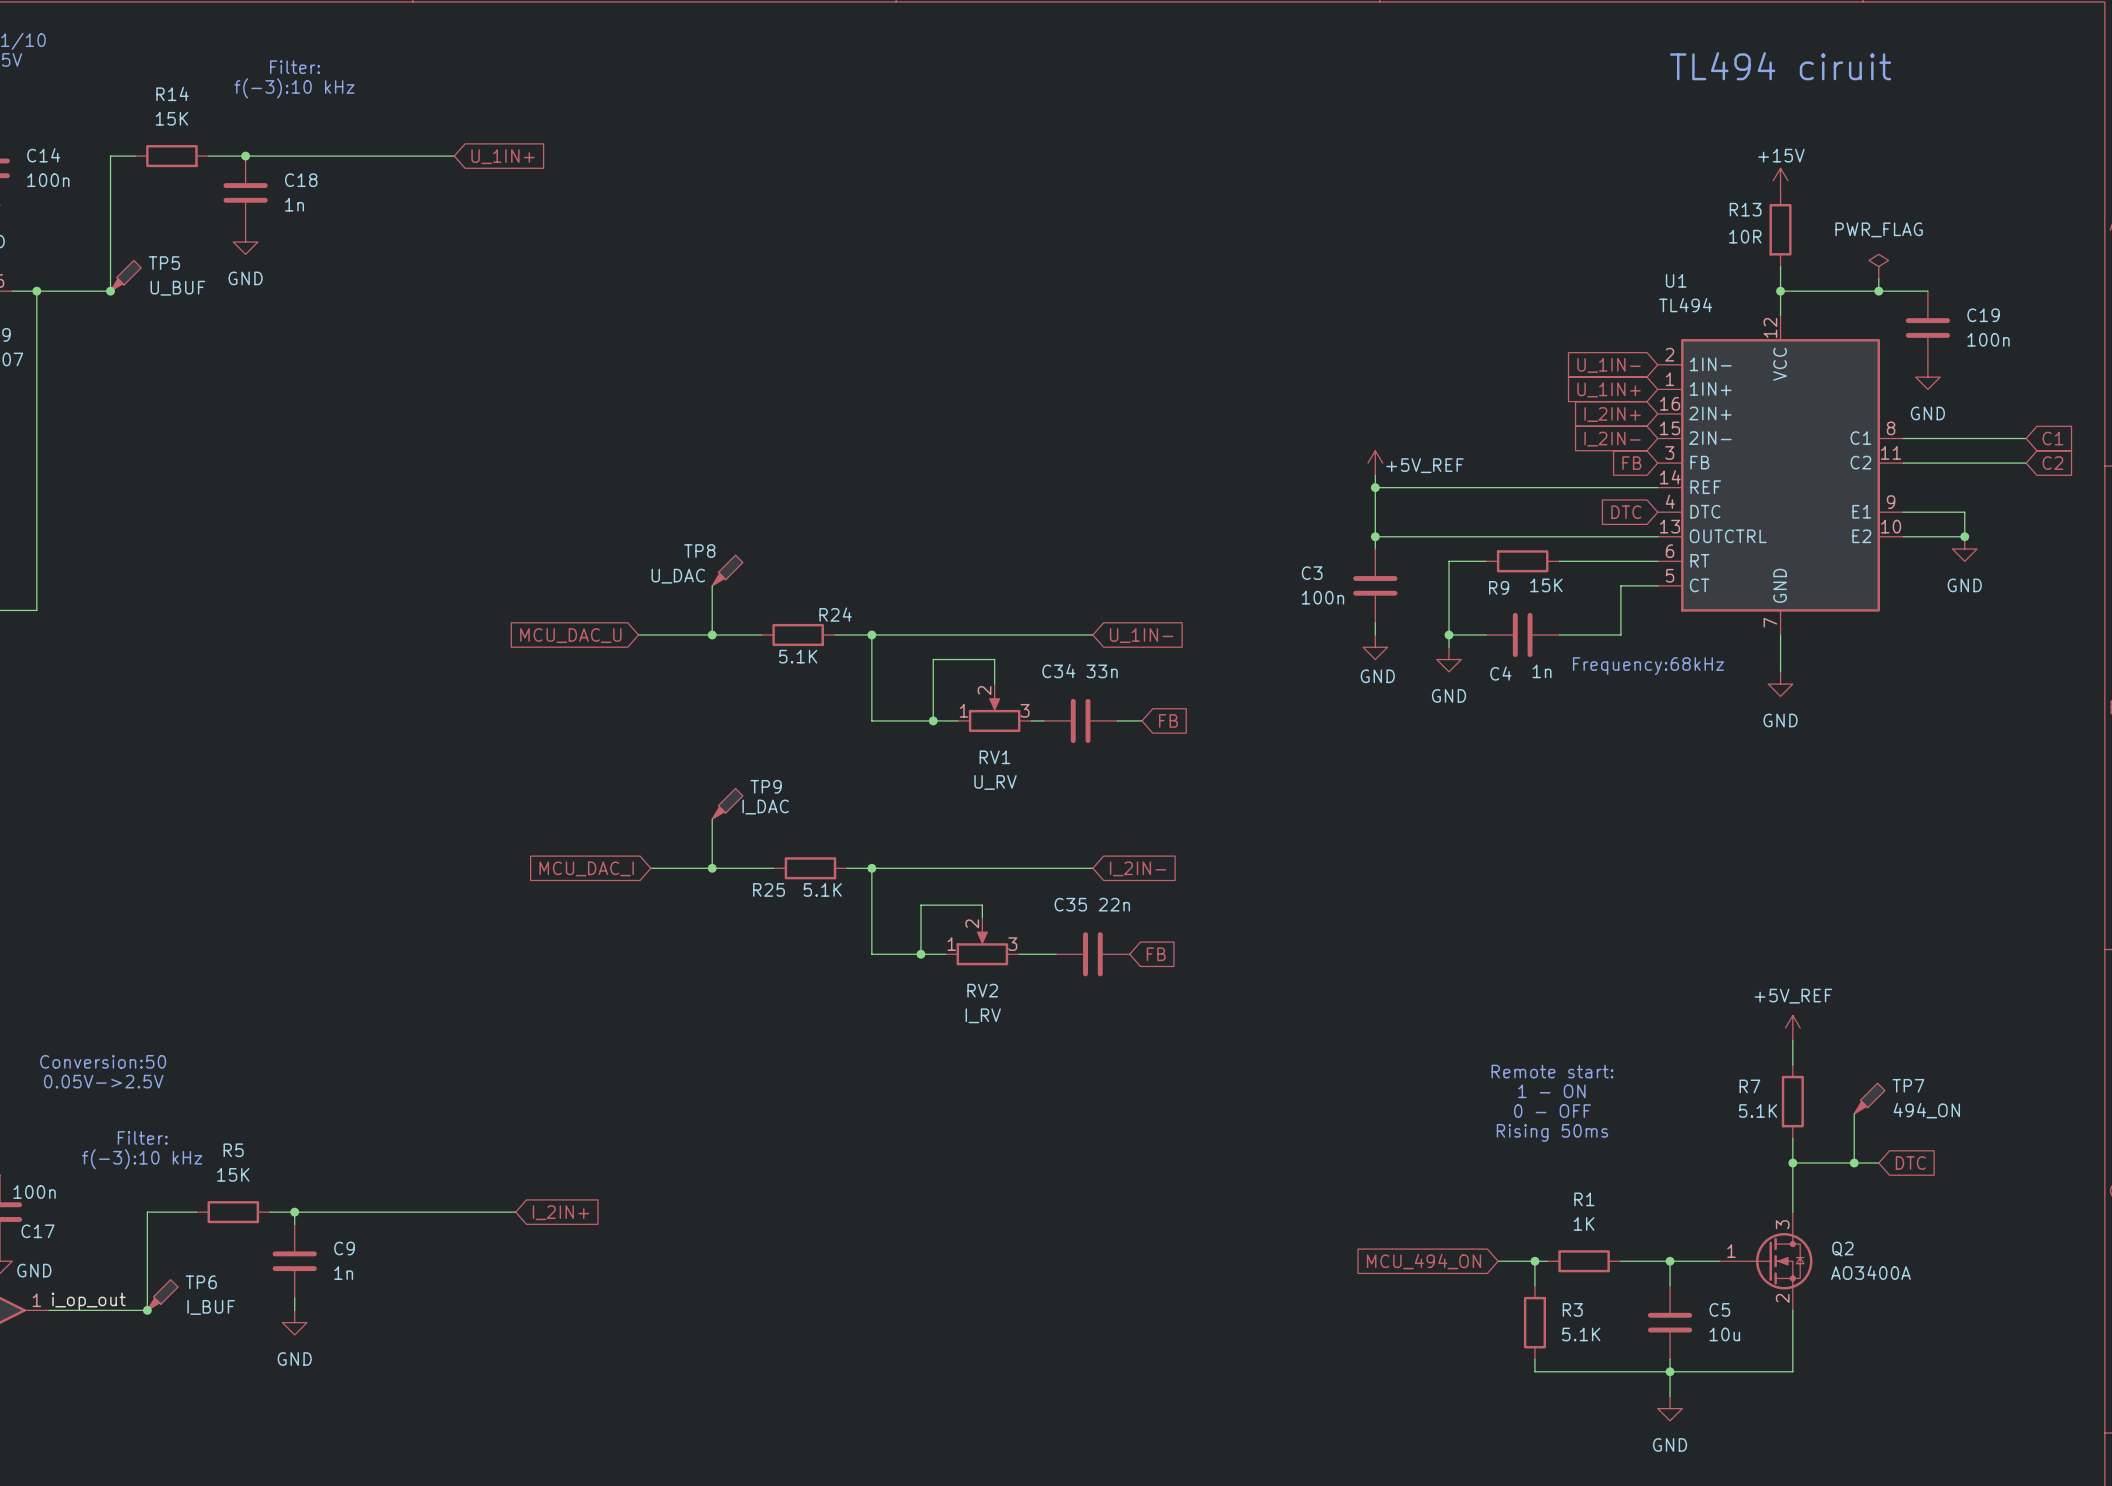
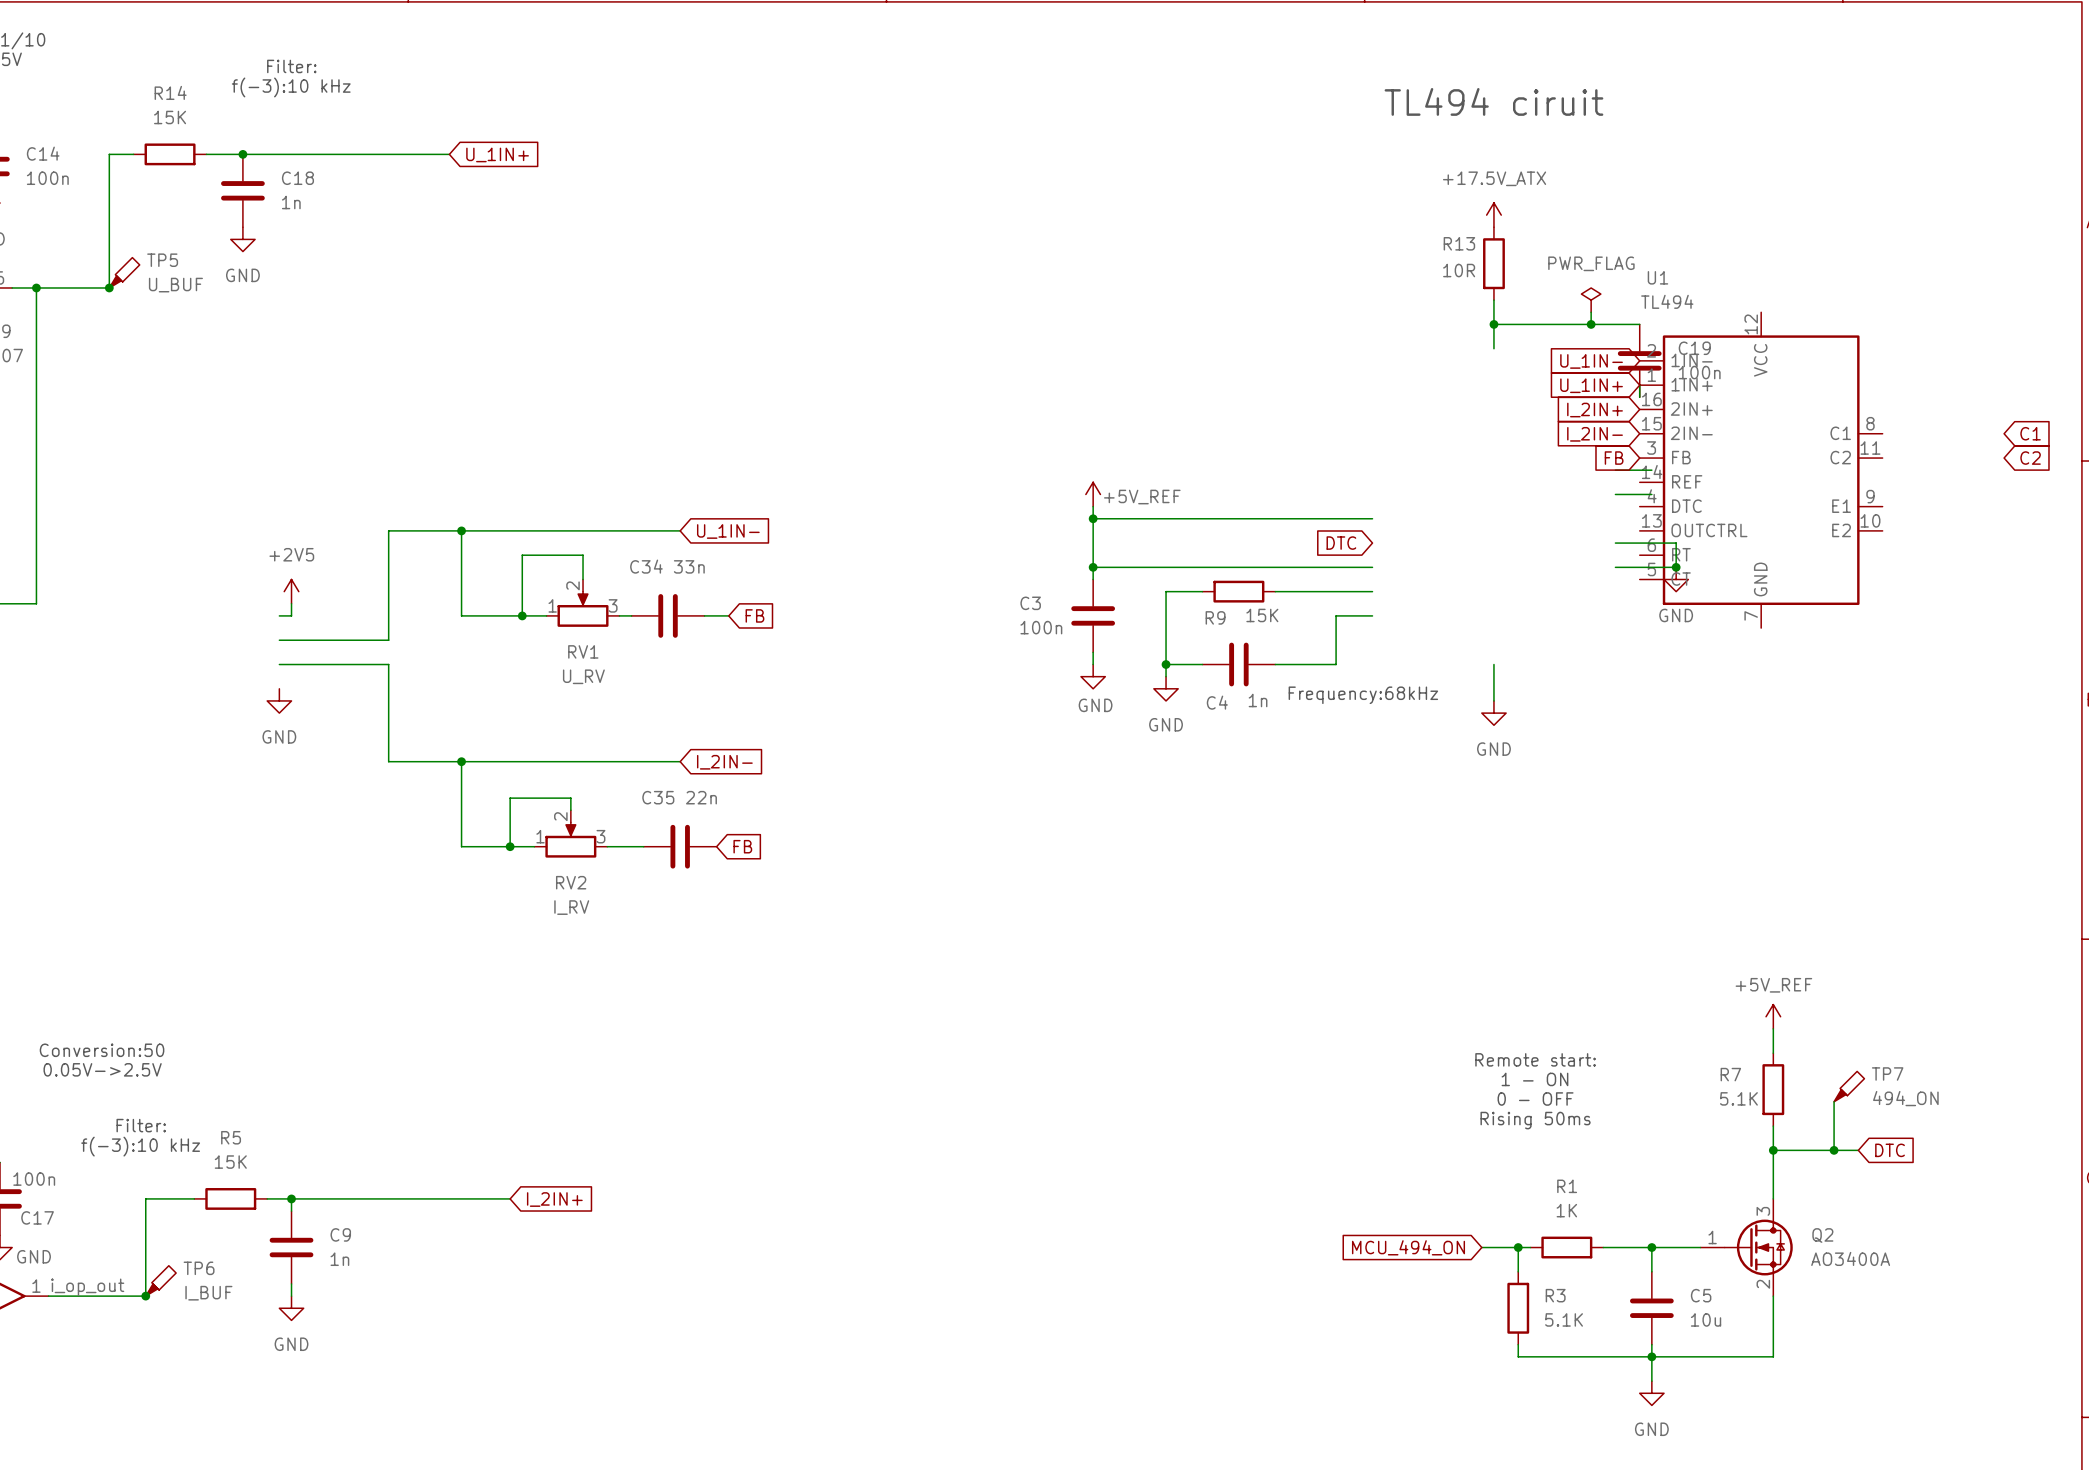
text: TL494 ciruit (1780, 66) -> none
text: none -> TL494 ciruit (1493, 101)
power symbol: +15V (1780, 180) -> none
power symbol: none -> +17.5V_ATX (1493, 215)
R13 position: (1780, 229) -> (1493, 263)
wire: (1780, 266) (1780, 315) -> none
power symbol: PWR_FLAG (1878, 266) -> none
wire: (1878, 278) (1878, 291) -> none
wire: (1780, 291) (1927, 291) -> none
junction: (1780, 291) -> none
junction: (1878, 291) -> none
wire: none -> (1493, 300) (1493, 348)
power symbol: none -> PWR_FLAG (1591, 300)
wire: none -> (1591, 312) (1591, 324)
wire: none -> (1493, 324) (1639, 324)
junction: none -> (1493, 324)
junction: none -> (1591, 324)
C19 position: (1927, 328) -> (1639, 360)
power symbol: GND (1927, 377) -> none
wire: none -> (1639, 385) (1639, 397)
wire: (1903, 438) (2026, 438) -> none
power symbol: +5V_REF (1375, 463) -> none
wire: (1903, 463) (2026, 463) -> none
wire: (1375, 475) (1375, 549) -> none
wire: none -> (1615, 470) (1651, 470)
wire: (1375, 487) (1657, 487) -> none
junction: (1375, 487) -> none
power symbol: none -> +5V_REF (1093, 494)
wire: none -> (1093, 506) (1093, 579)
global label: DTC (1626, 512) -> none
wire: (1903, 512) (1964, 512) (1964, 536) (1903, 536) -> none
wire: none -> (1093, 518) (1372, 518)
junction: none -> (1093, 518)
wire: none -> (461, 530) (461, 615) (546, 615)
junction: none -> (461, 530)
wire: none -> (680, 530) (388, 530) (388, 640) (279, 640)
wire: (1375, 536) (1657, 536) -> none
junction: (1375, 536) -> none
junction: (1964, 536) -> none
global label: none -> U_1IN- (728, 531)
global label: none -> DTC (1341, 543)
wire: none -> (1615, 543) (1676, 543) (1676, 567) (1615, 567)
power symbol: GND (1964, 549) -> none
wire: (1485, 561) (1449, 561) (1449, 647) -> none
R9 position: (1522, 561) -> (1238, 591)
wire: (1559, 561) (1657, 561) -> none
TP8: U_DAC (727, 570) -> none
wire: none -> (1093, 567) (1372, 567)
junction: none -> (1093, 567)
junction: none -> (1676, 567)
wire: none -> (583, 579) (583, 555) (522, 555) (522, 615)
wire: (712, 585) (712, 634) -> none
C3 position: (1375, 585) -> (1093, 615)
wire: (1657, 585) (1620, 585) (1620, 634) (1559, 634) -> none
power symbol: none -> GND (1676, 579)
power symbol: none -> +2V5 (291, 591)
wire: none -> (1202, 591) (1166, 591) (1166, 676)
wire: none -> (1275, 591) (1372, 591)
wire: none -> (291, 603) (291, 615) (279, 615)
junction: none -> (522, 615)
wire: none -> (619, 615) (631, 615)
wire: none -> (704, 615) (728, 615)
global label: none -> FB (754, 615)
wire: (1375, 622) (1375, 634) -> none
wire: none -> (1372, 615) (1336, 615) (1336, 664) (1275, 664)
wire: (638, 634) (761, 634) -> none
junction: (712, 634) -> none
R24: 5.1K (798, 634) -> none
wire: (835, 634) (1092, 634) -> none
wire: (871, 634) (871, 720) (957, 720) -> none
junction: (871, 634) -> none
wire: (1449, 634) (1485, 634) -> (1615, 494) (1651, 494)
junction: (1449, 634) -> none
C4 position: (1522, 634) -> (1238, 664)
wire: (1780, 634) (1780, 671) -> none
global label: MCU_DAC_U (570, 635) -> none
global label: U_1IN- (1141, 635) -> none
power symbol: GND (1375, 647) -> none
wire: none -> (1093, 652) (1093, 664)
power symbol: GND (1449, 659) -> none
text: Frequency:68kHz (1648, 666) -> none
wire: none -> (279, 664) (388, 664) (388, 761) (680, 761)
wire: none -> (1166, 664) (1202, 664)
junction: none -> (1166, 664)
wire: none -> (1493, 664) (1493, 700)
wire: (994, 684) (994, 659) (933, 659) (933, 720) -> none
power symbol: none -> GND (1093, 676)
power symbol: GND (1780, 684) -> none
power symbol: none -> GND (1166, 688)
text: none -> Frequency:68kHz (1363, 695)
power symbol: none -> GND (279, 700)
RV1 position: (994, 708) -> (583, 603)
junction: (933, 720) -> none
wire: (1031, 720) (1043, 720) -> none
C34 position: (1080, 720) -> (668, 615)
wire: (1117, 720) (1142, 720) -> none
global label: FB (1168, 720) -> none
power symbol: none -> GND (1493, 713)
wire: none -> (461, 761) (461, 846) (534, 846)
junction: none -> (461, 761)
global label: none -> I_2IN- (724, 762)
TP9: I_DAC (727, 803) -> none
wire: none -> (570, 810) (570, 798) (510, 798) (510, 846)
wire: (712, 819) (712, 868) -> none
junction: none -> (510, 846)
global label: none -> FB (742, 846)
global label: MCU_DAC_I (586, 868) -> none
wire: (650, 868) (773, 868) -> none
junction: (712, 868) -> none
R25: 5.1K (810, 868) -> none
wire: (847, 868) (1092, 868) -> none
wire: (871, 868) (871, 954) (945, 954) -> none
junction: (871, 868) -> none
global label: I_2IN- (1138, 868) -> none
wire: (982, 917) (982, 905) (920, 905) (920, 954) -> none
RV2 position: (982, 941) -> (570, 833)
junction: (920, 954) -> none
wire: (1019, 954) (1056, 954) -> none
C35 position: (1092, 954) -> (680, 846)
global label: FB (1156, 954) -> none

